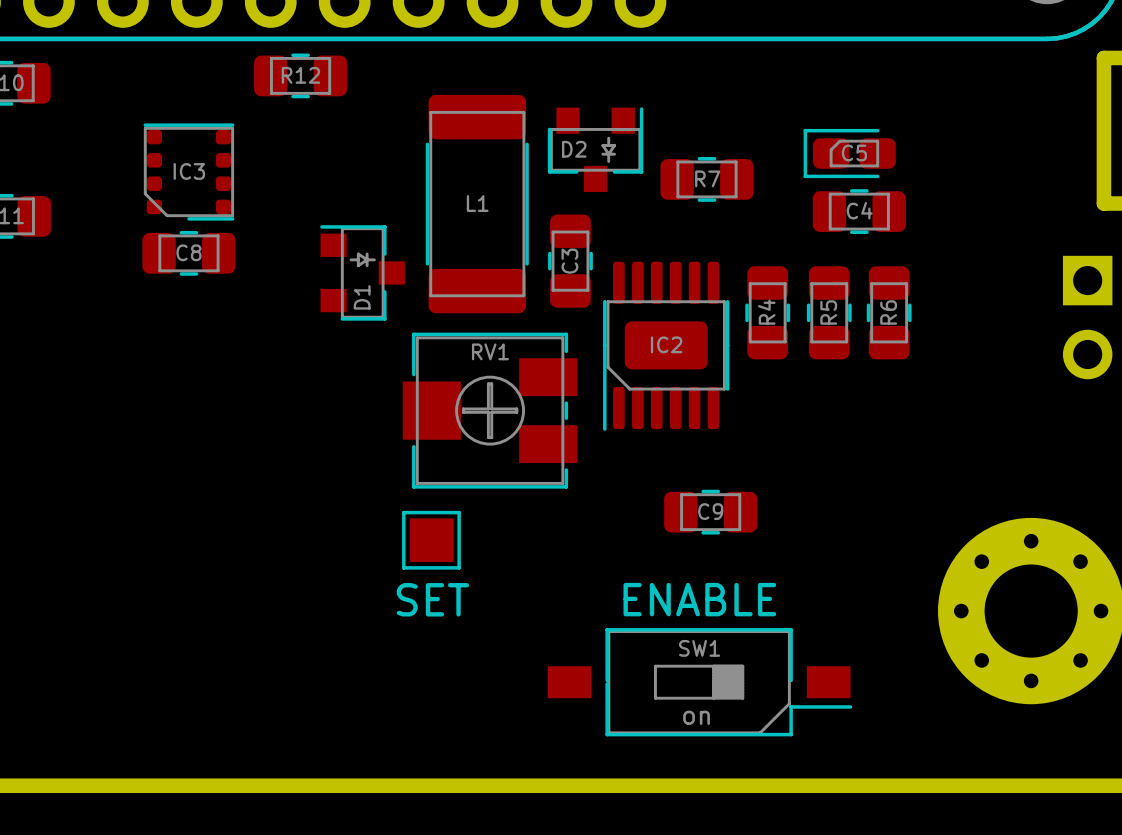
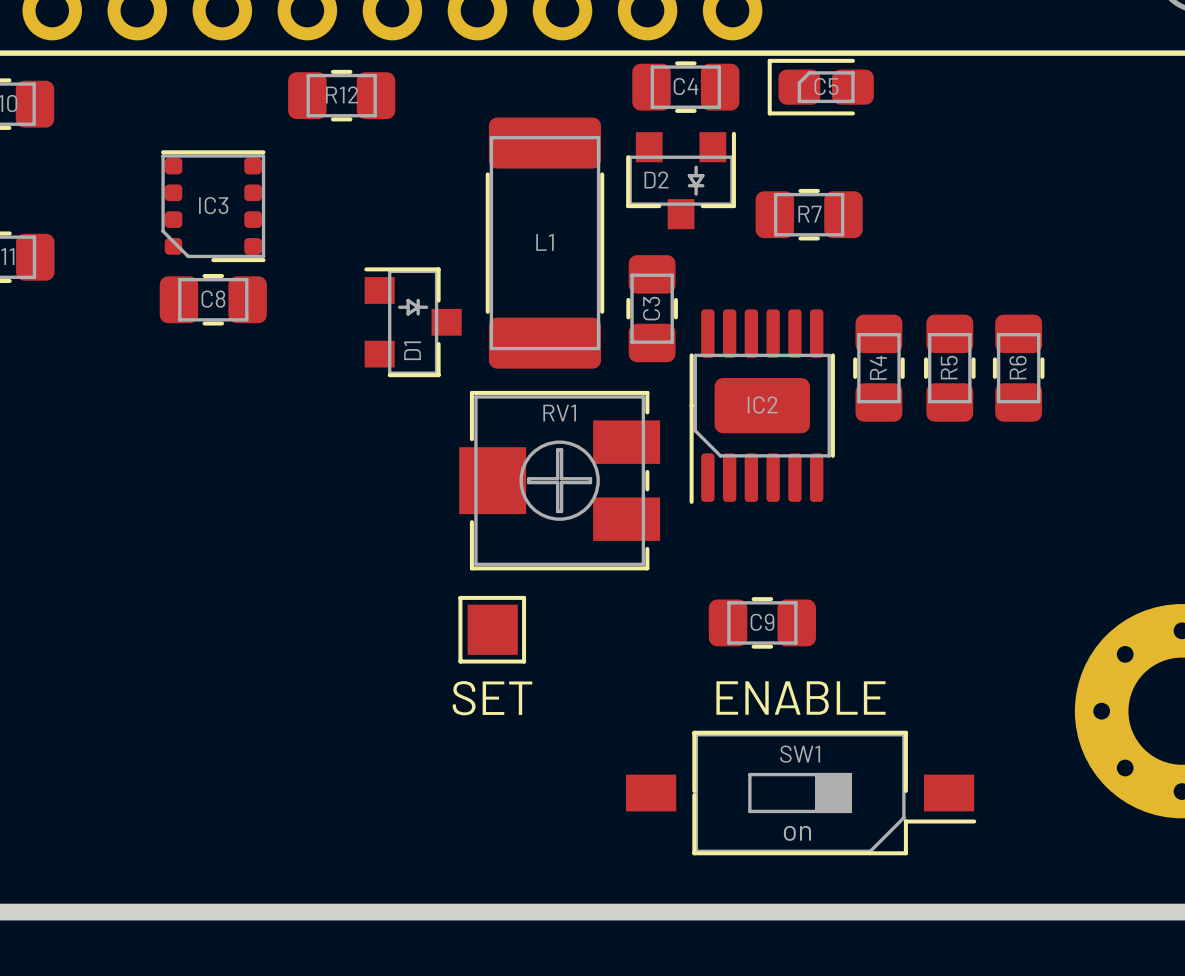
C5 position: (849, 153) -> (820, 87)
C4 position: (859, 211) -> (685, 87)
C9 position: (710, 512) -> (762, 622)

